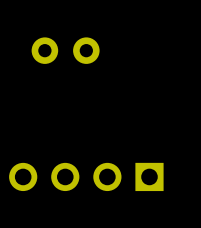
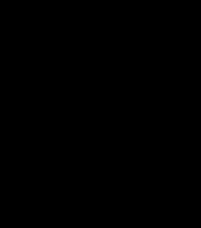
part: (65, 50) -> none
part: (86, 176) -> none

